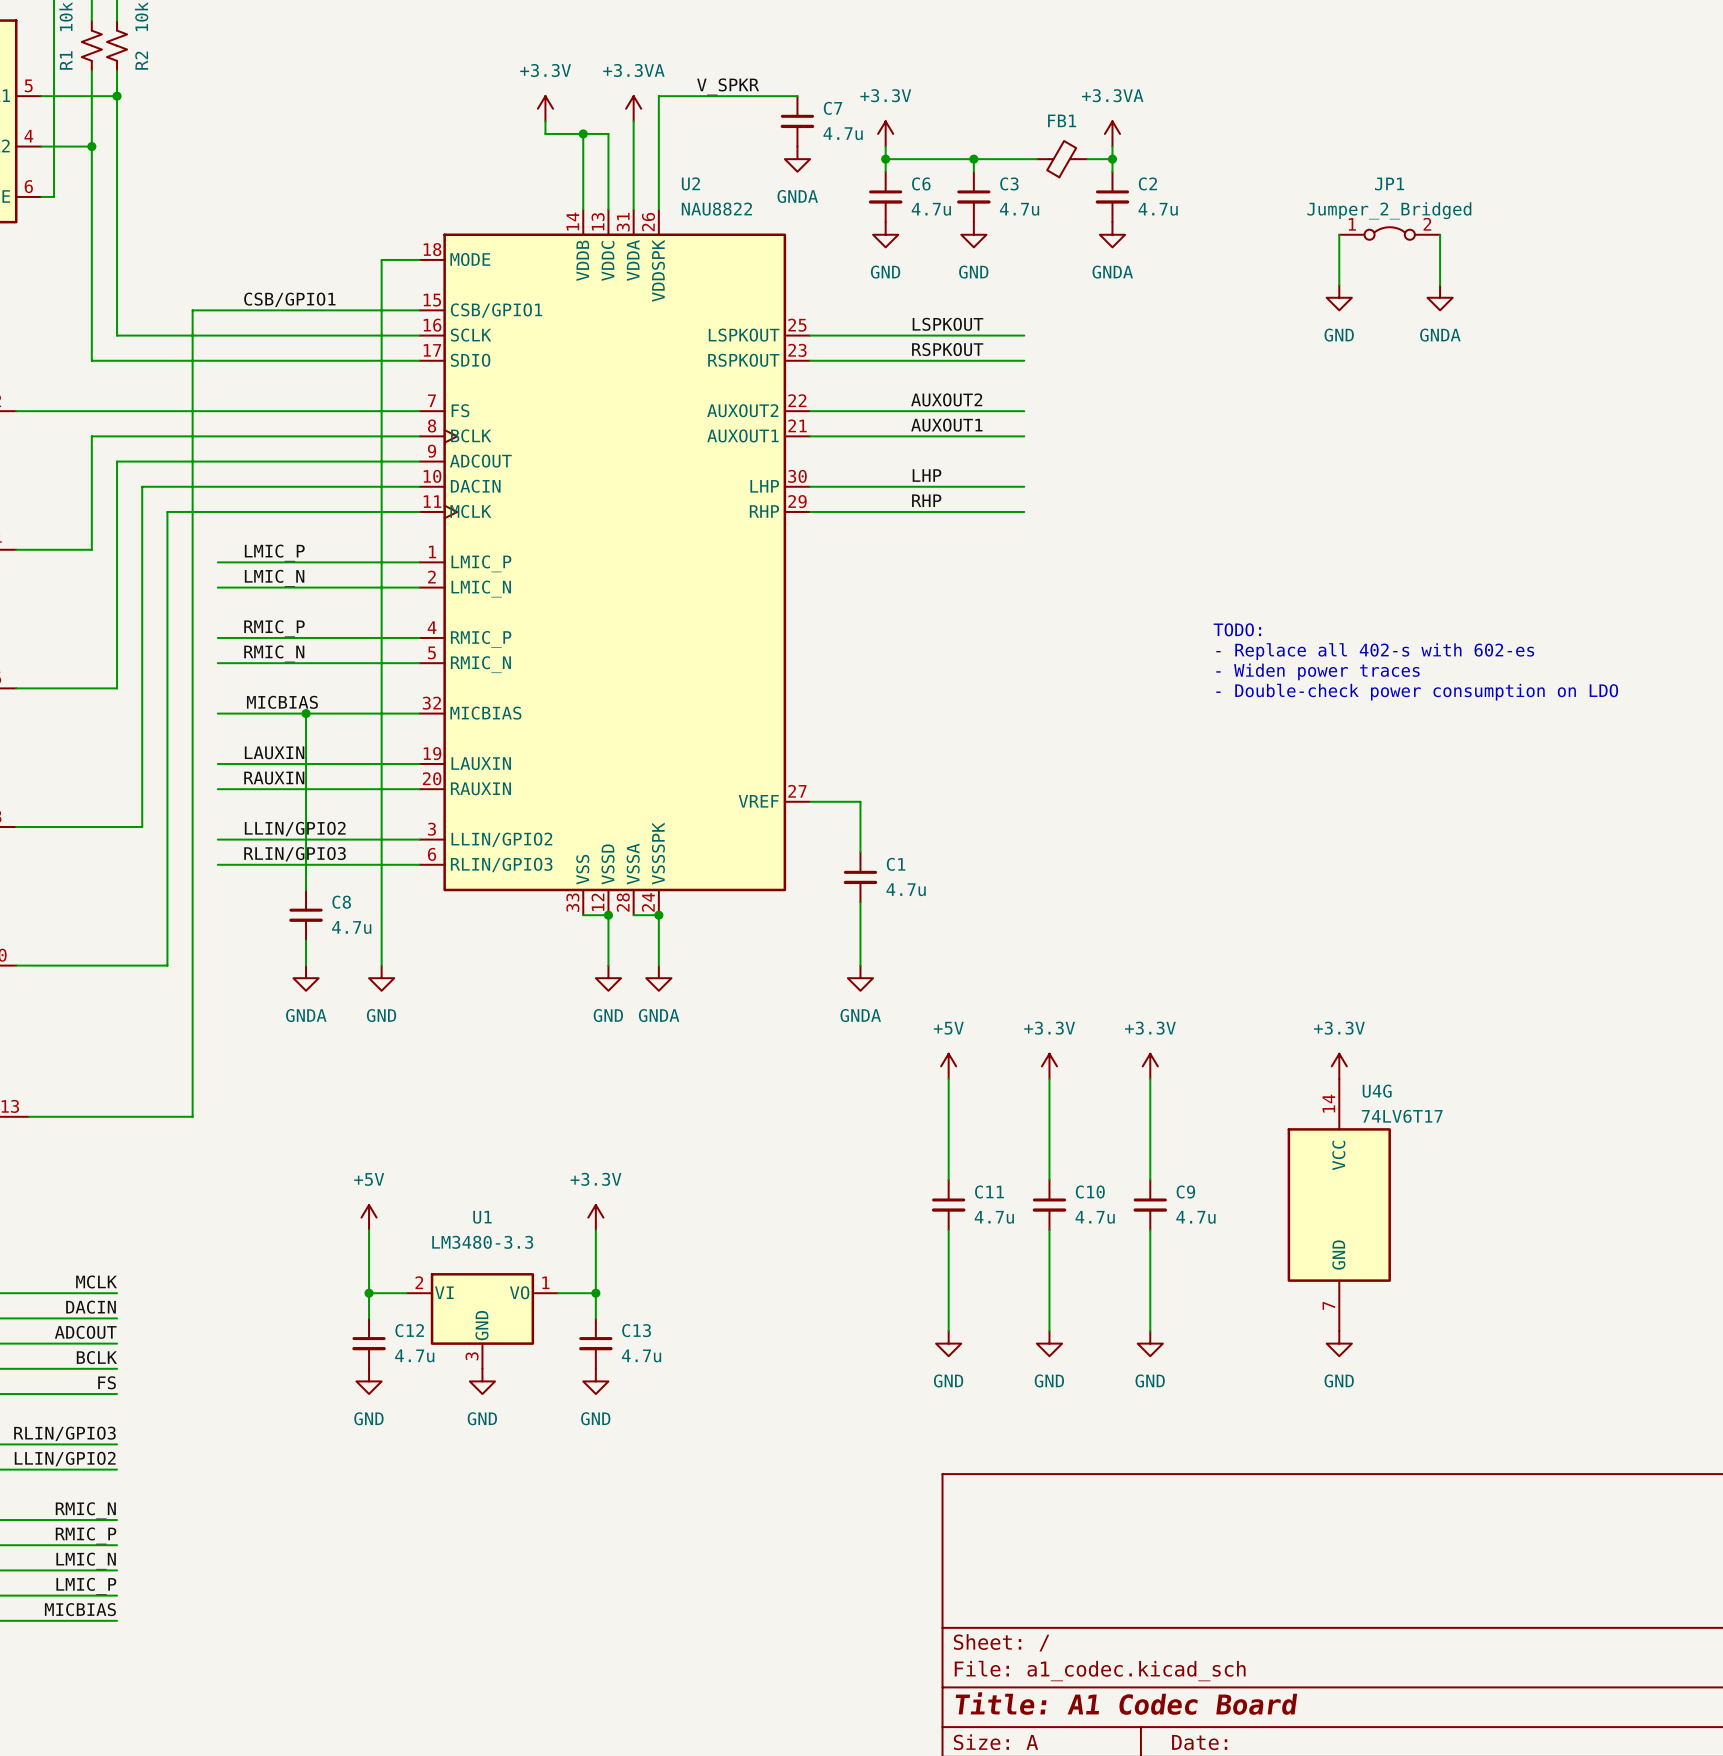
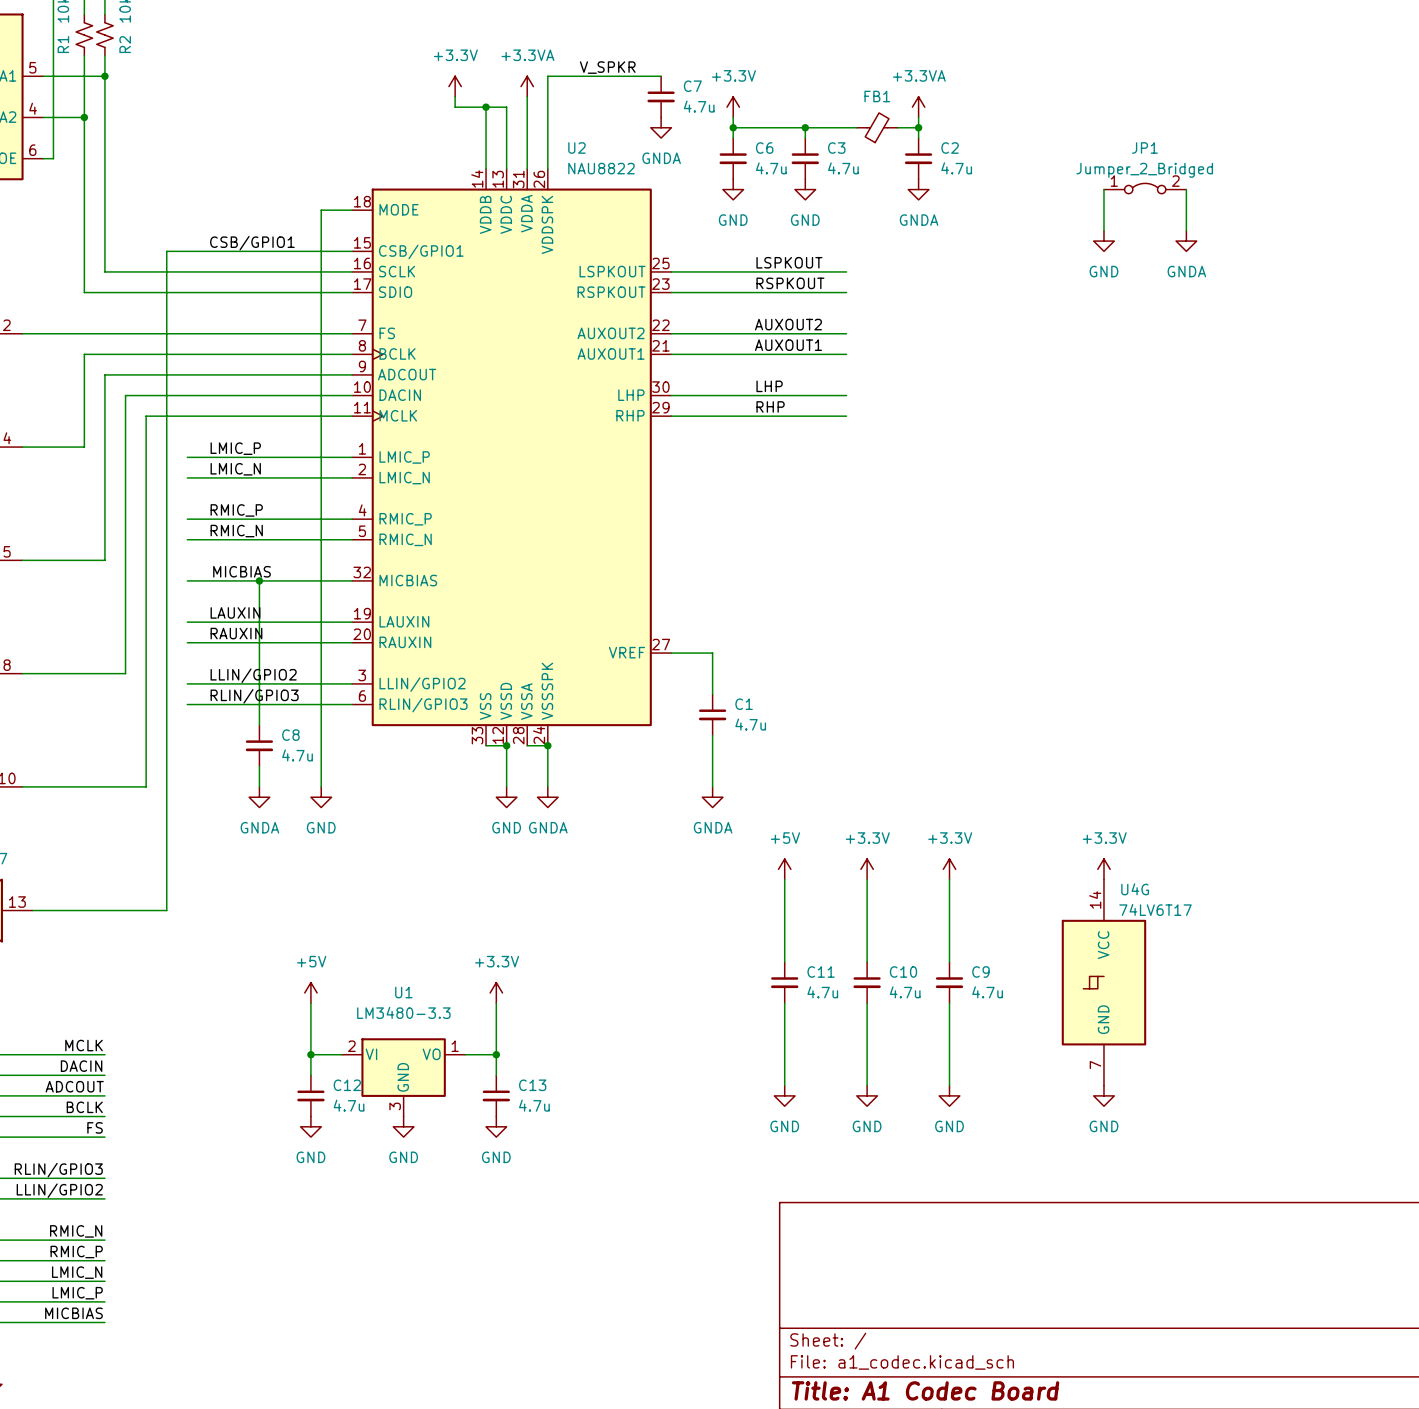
text: TODO: (1237, 629) -> none
text: - Replace all 402-s with 602-es (1375, 651) -> none
text: - Widen power traces (1317, 671) -> none
text: - Double-check power consumption on LDO (1417, 692) -> none
U4G symbol: [1287, 1079, 1391, 1332] -> [1061, 879, 1147, 1086]

